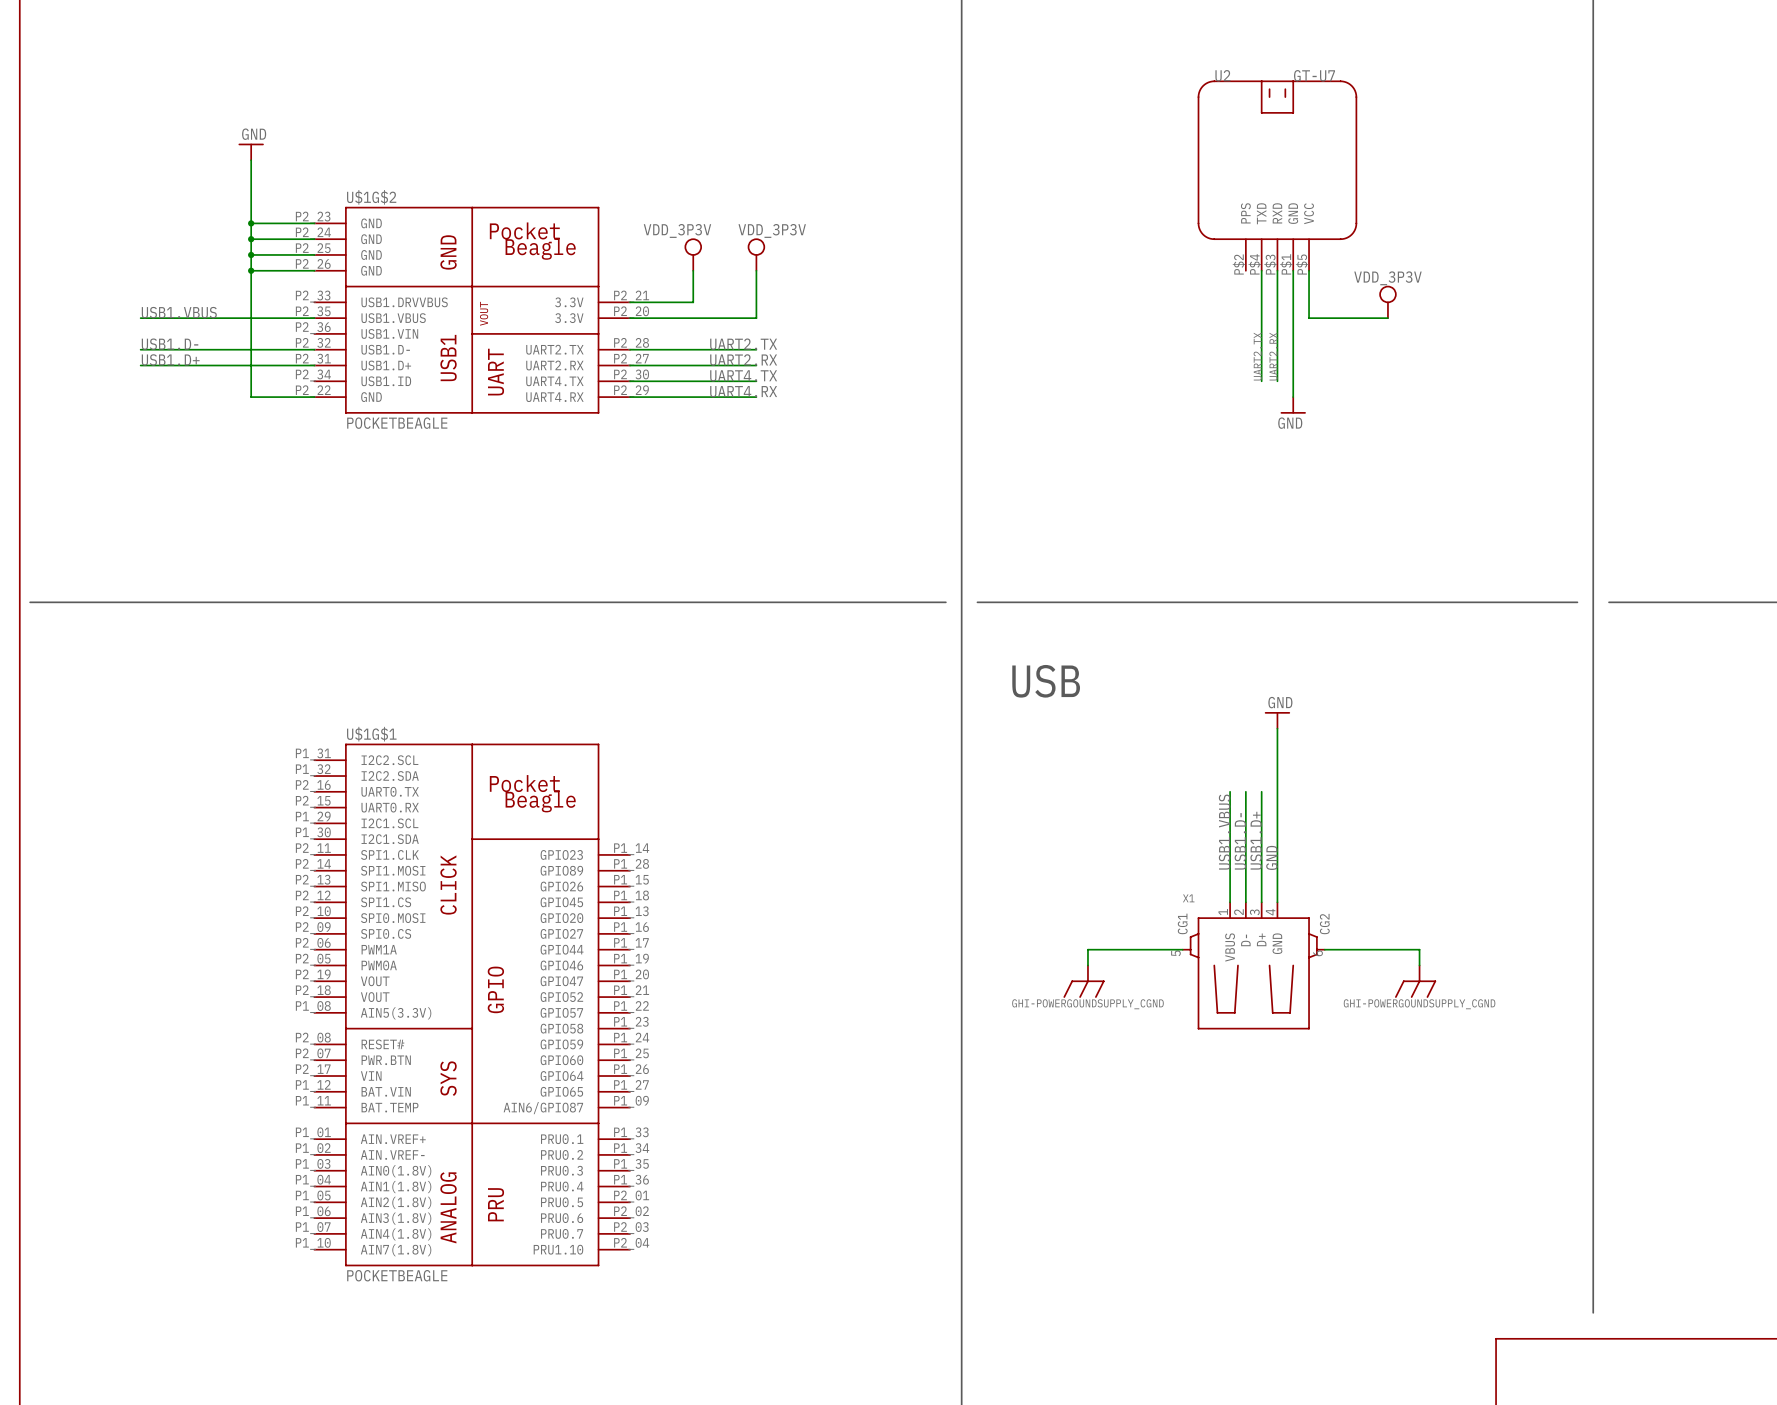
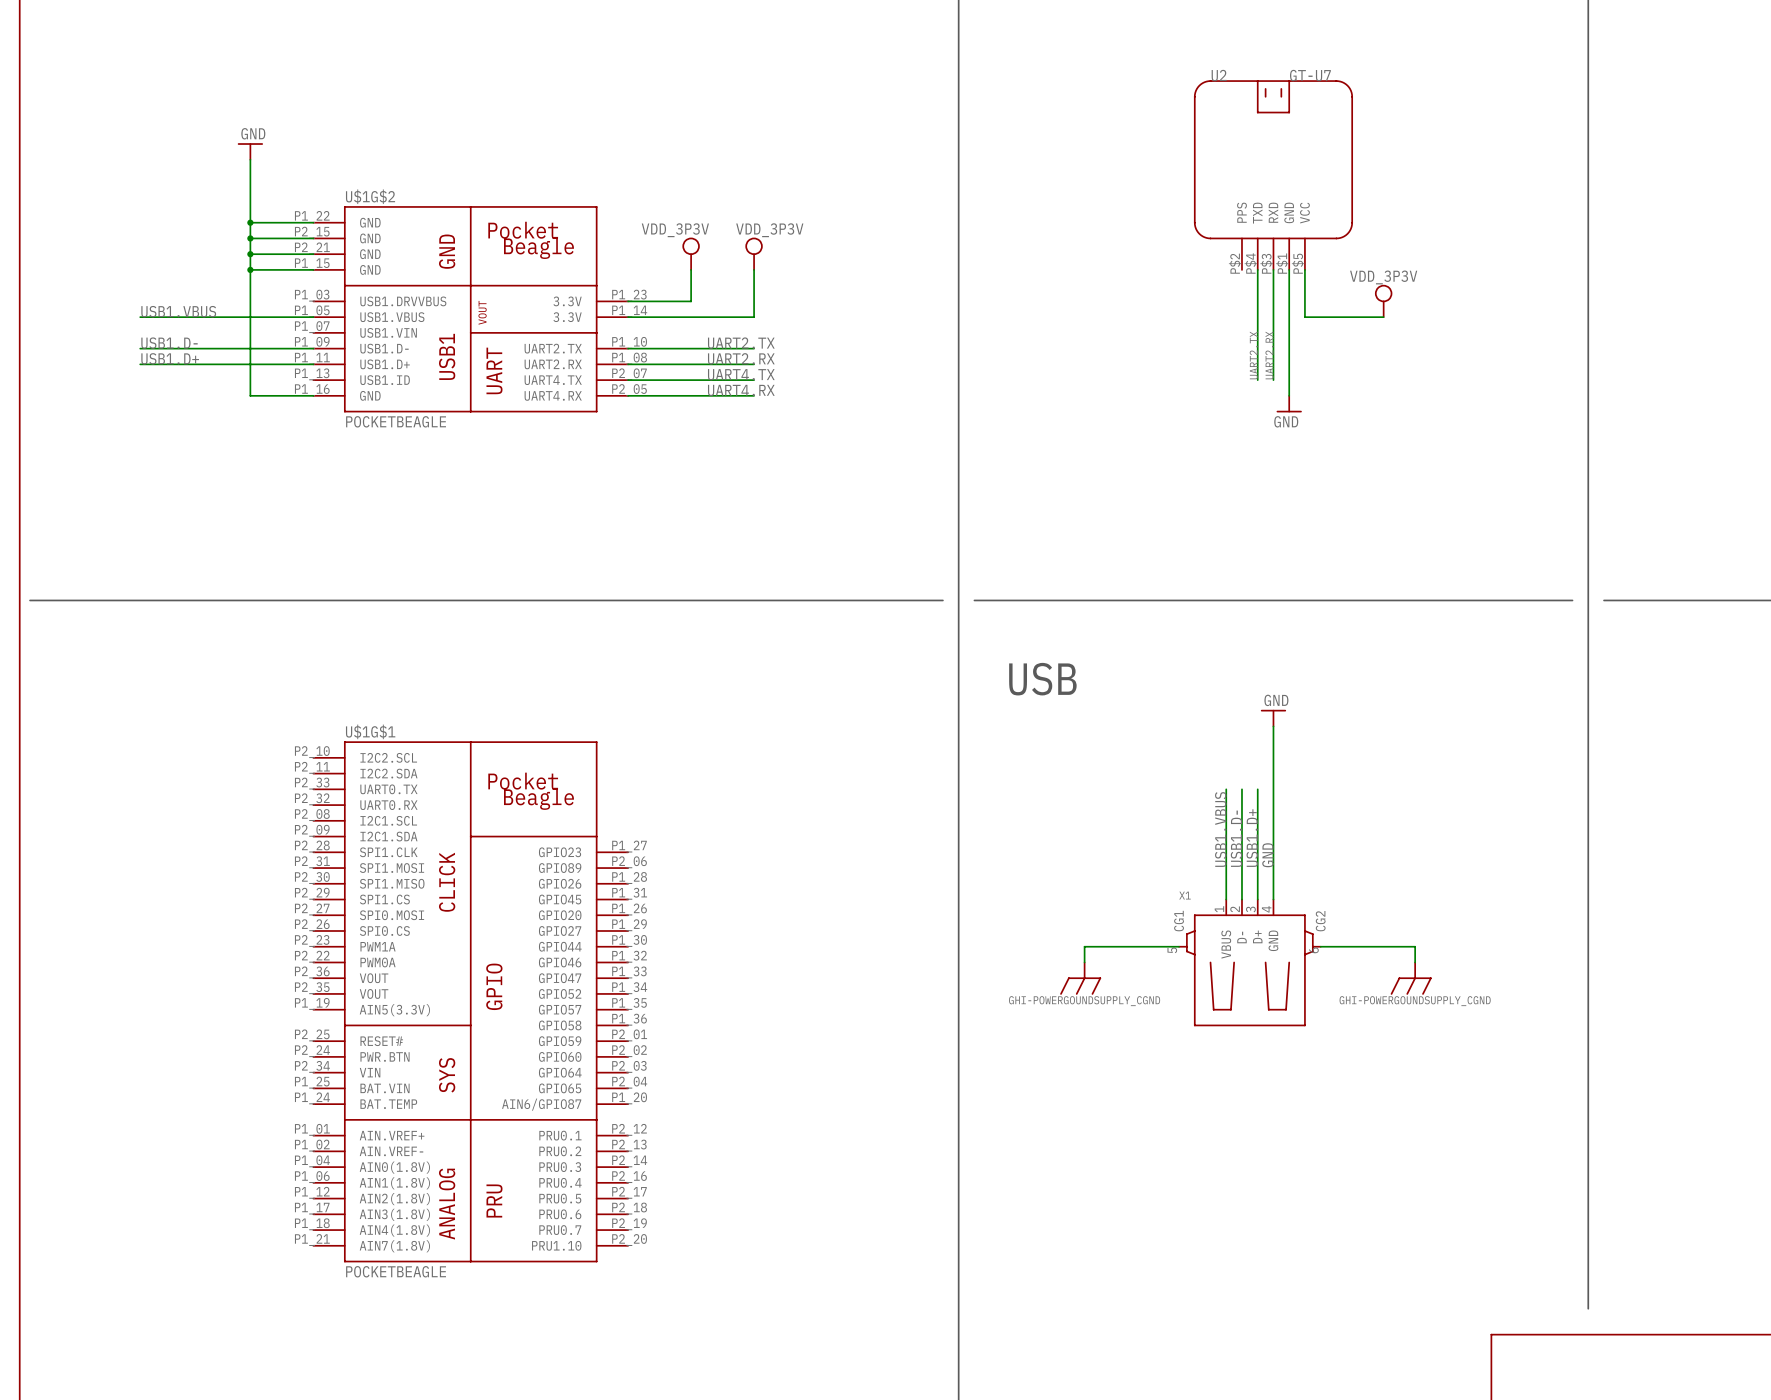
U$1G$2 symbol: [314, 206, 631, 414] -> [313, 206, 629, 413]
U$1G$1 symbol: [314, 743, 631, 1267] -> [313, 741, 629, 1263]

